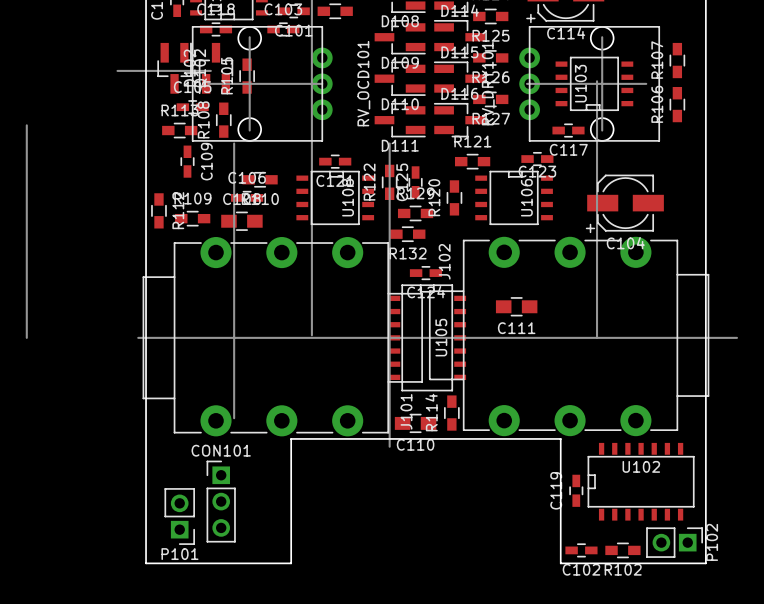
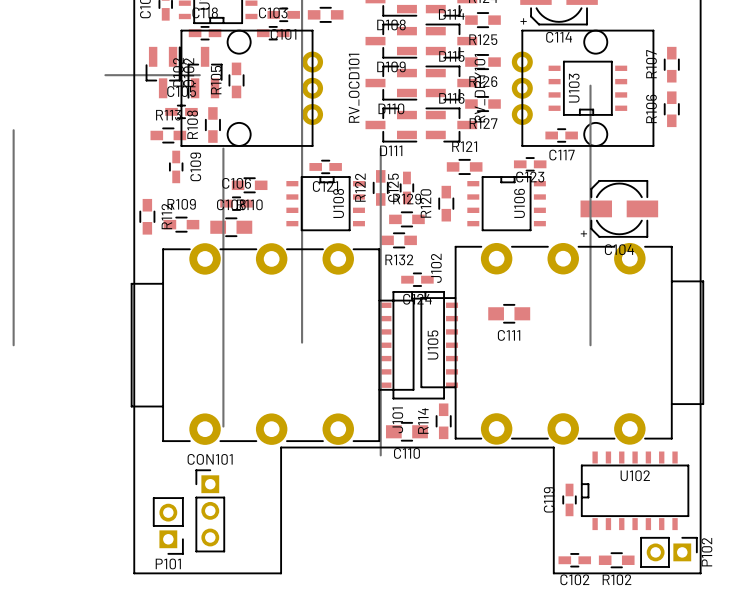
line: (249, 37) (249, 130) -> none
line: (602, 37) (602, 130) -> none
line: (208, 83) (322, 83) -> none
line: (527, 83) (646, 83) -> none
line: (138, 337) (736, 337) -> none

